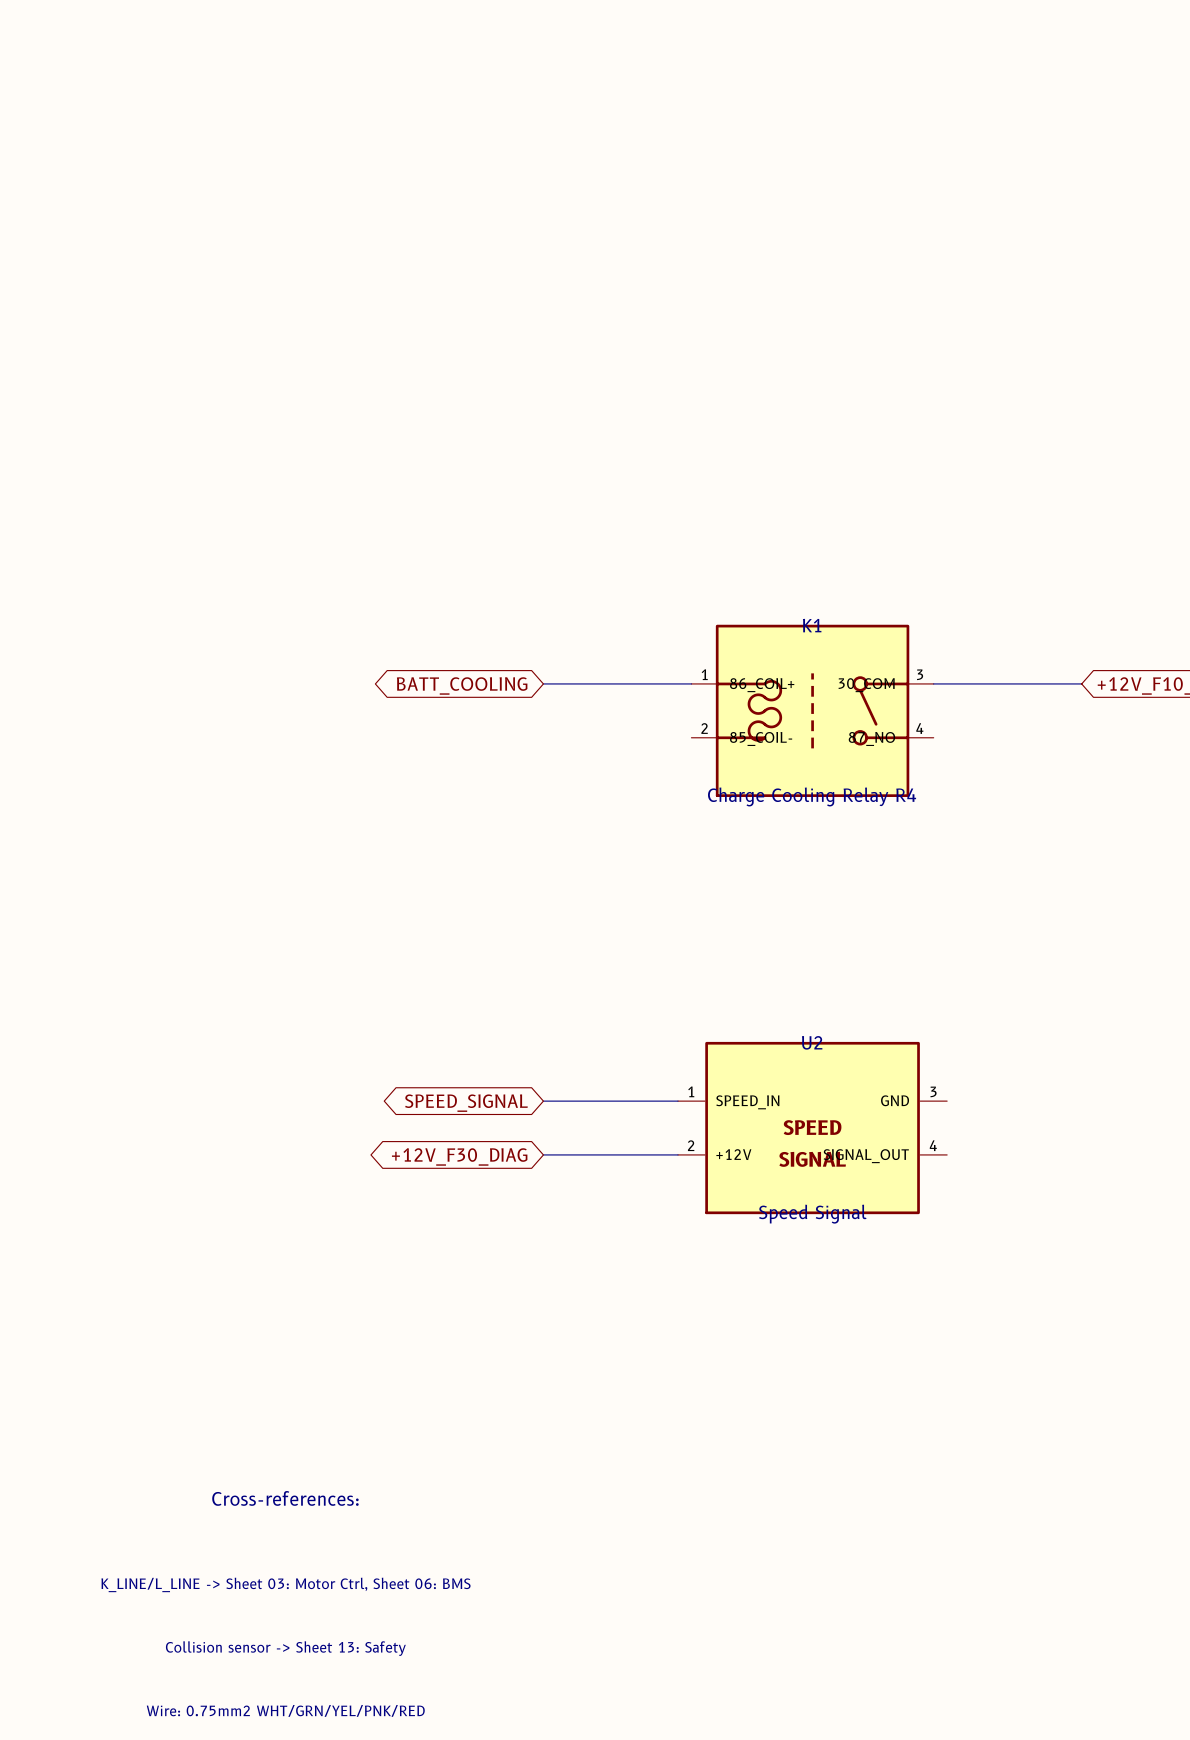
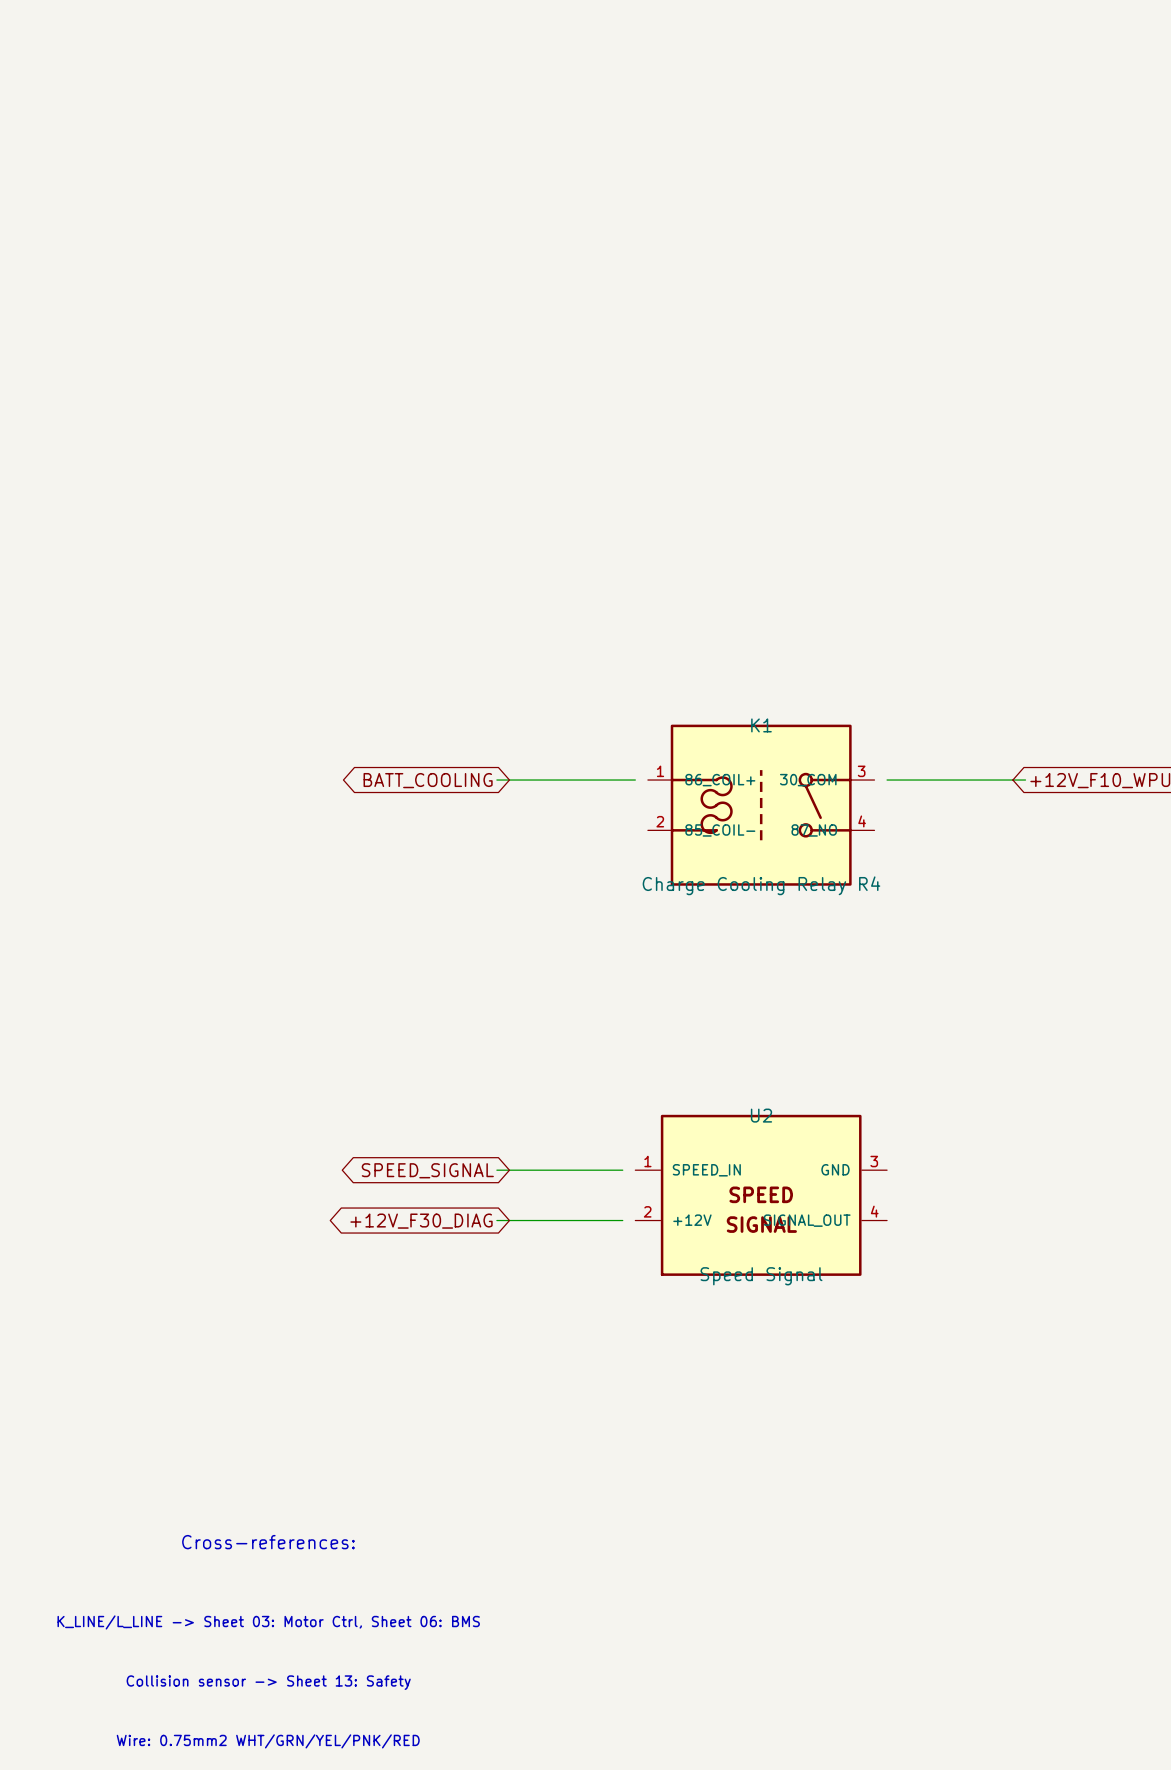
wire: (677, 683) (691, 683) -> (496, 780) (509, 780)
wire: (933, 683) (947, 683) -> (1012, 780) (1025, 780)
wire: (664, 1101) (677, 1101) -> (496, 1170) (509, 1170)
wire: (664, 1154) (677, 1154) -> (496, 1220) (509, 1220)

